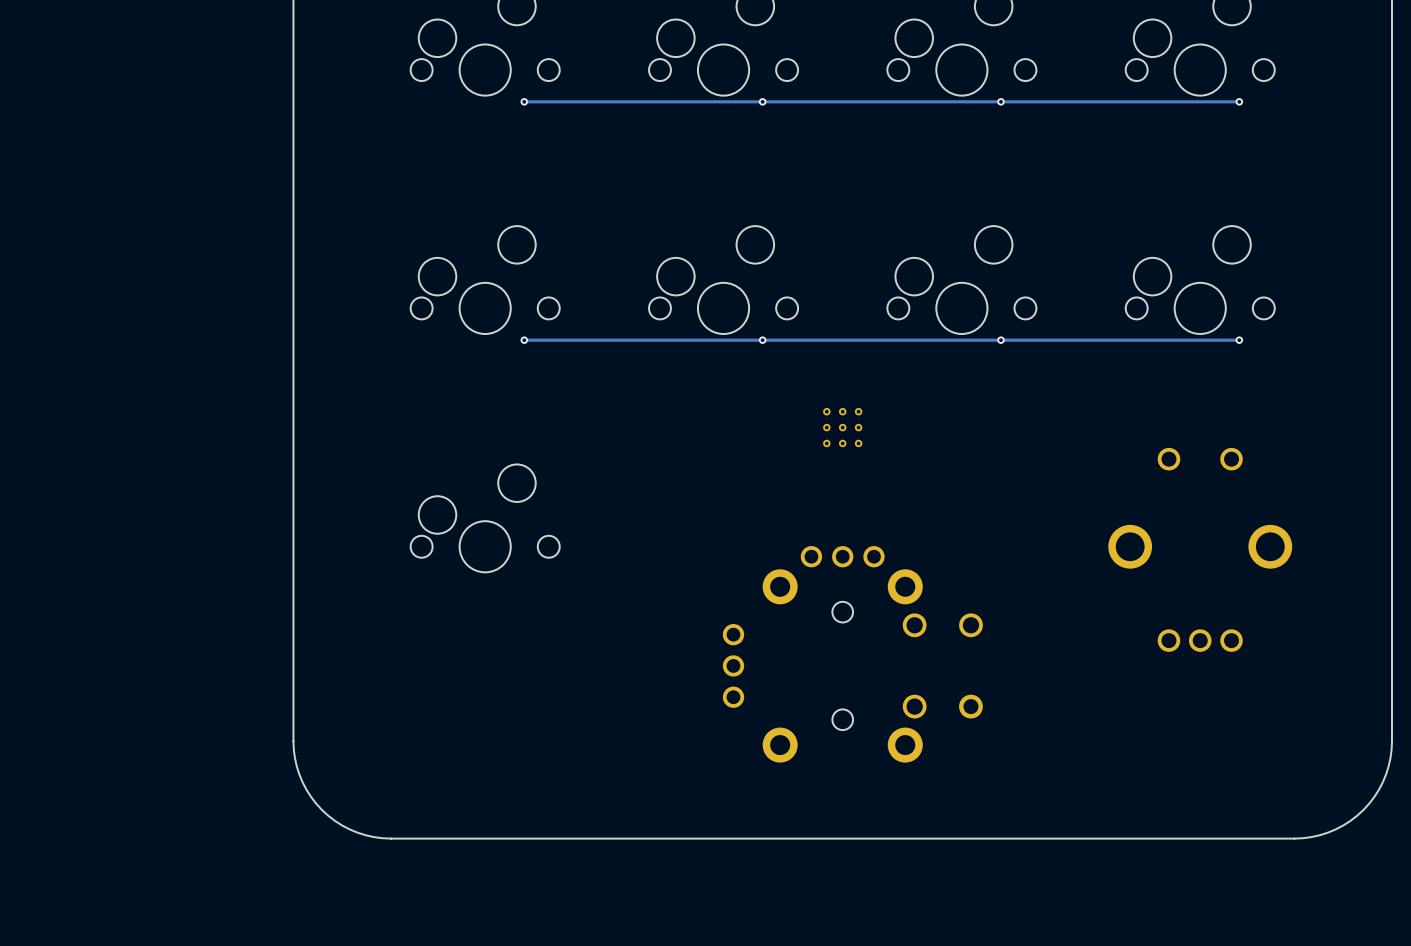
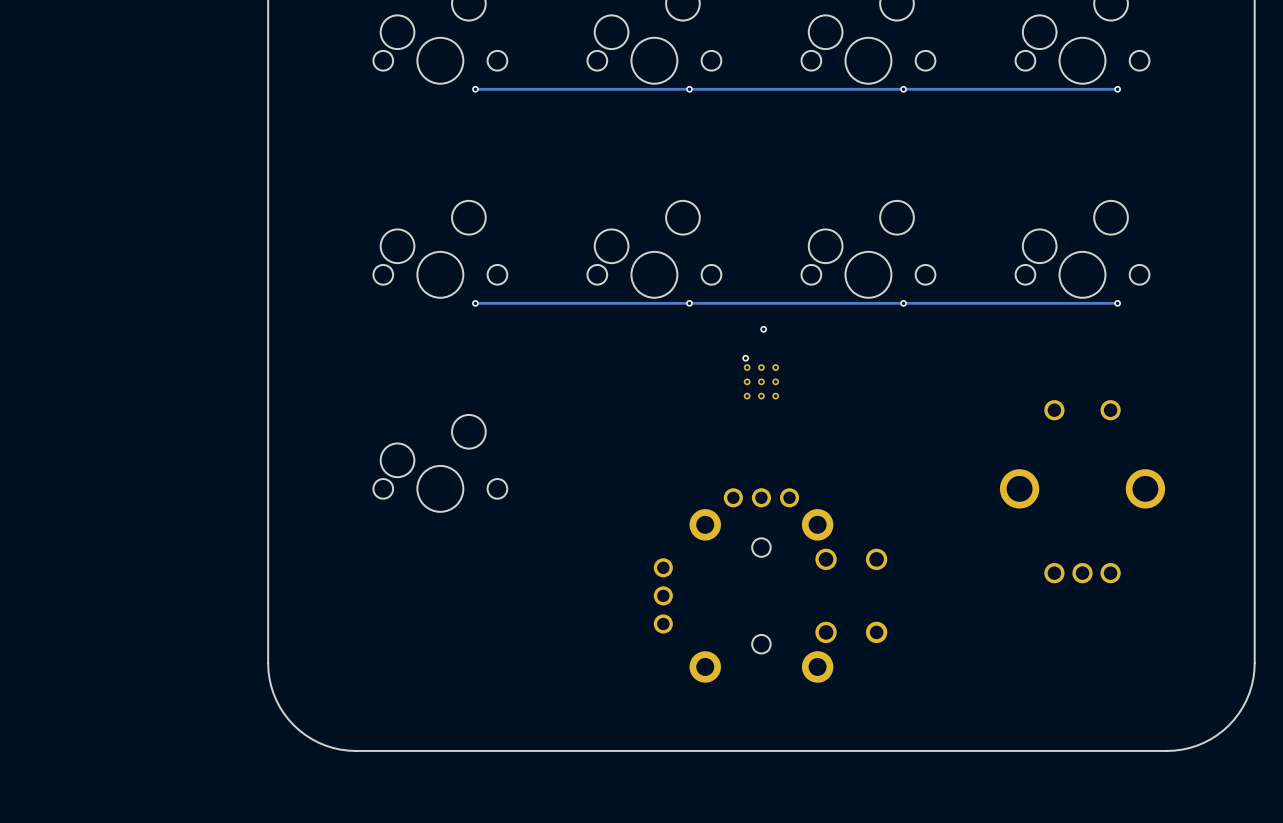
via: none -> (763, 329)
via: none -> (745, 358)

